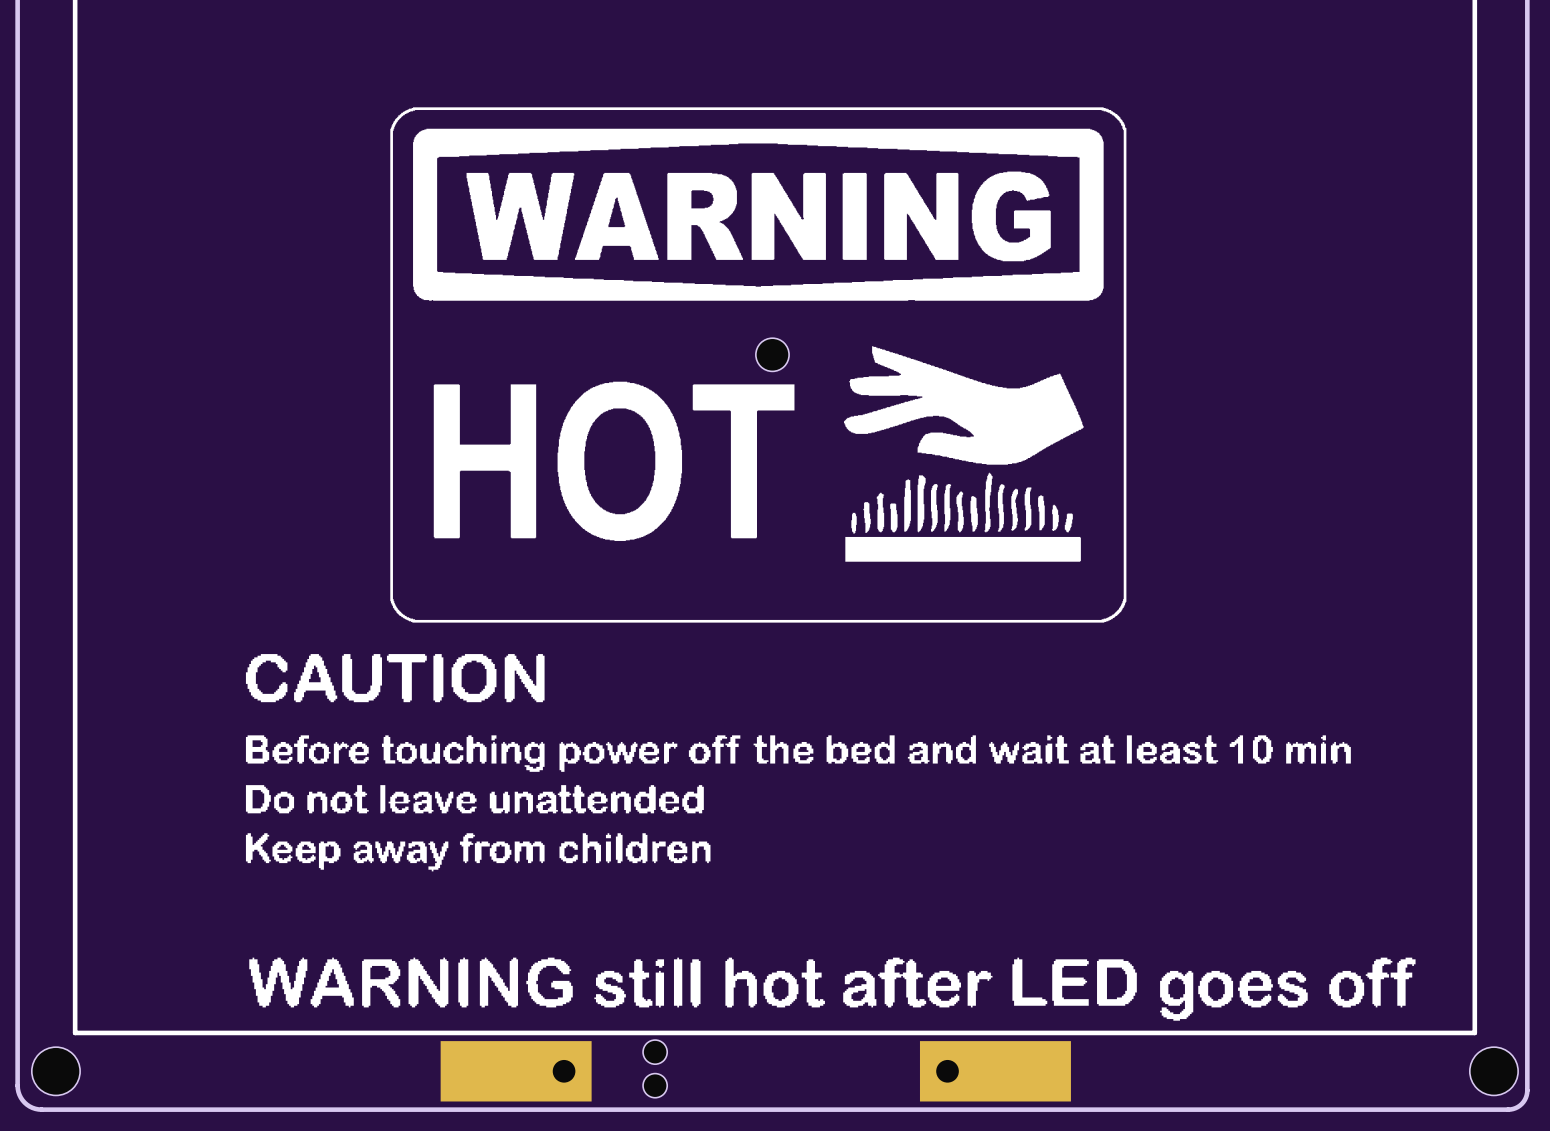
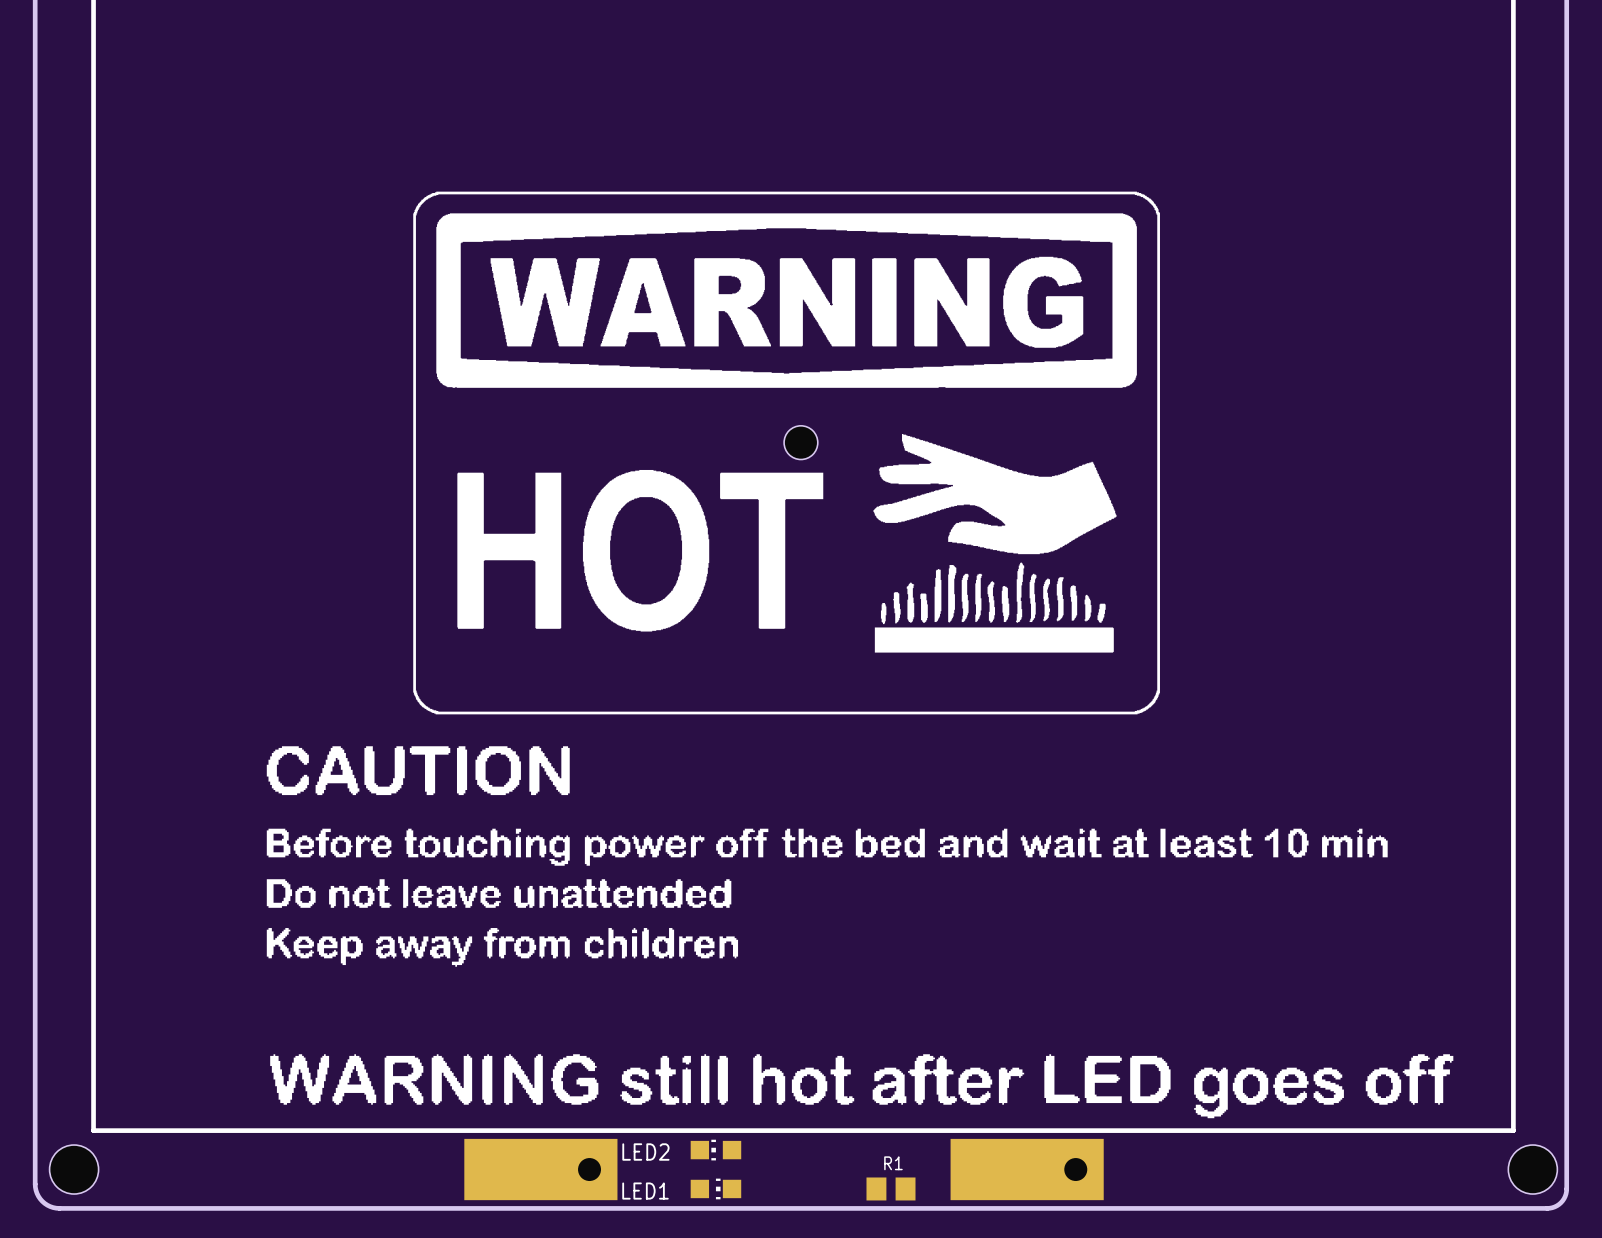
part: (655, 1052) -> none
LED1: none -> (715, 1150)
part rotation: 0° (995, 1071) -> 180° (1027, 1169)
part: (655, 1085) -> none
LED2: none -> (715, 1188)
R1: none -> (890, 1188)

